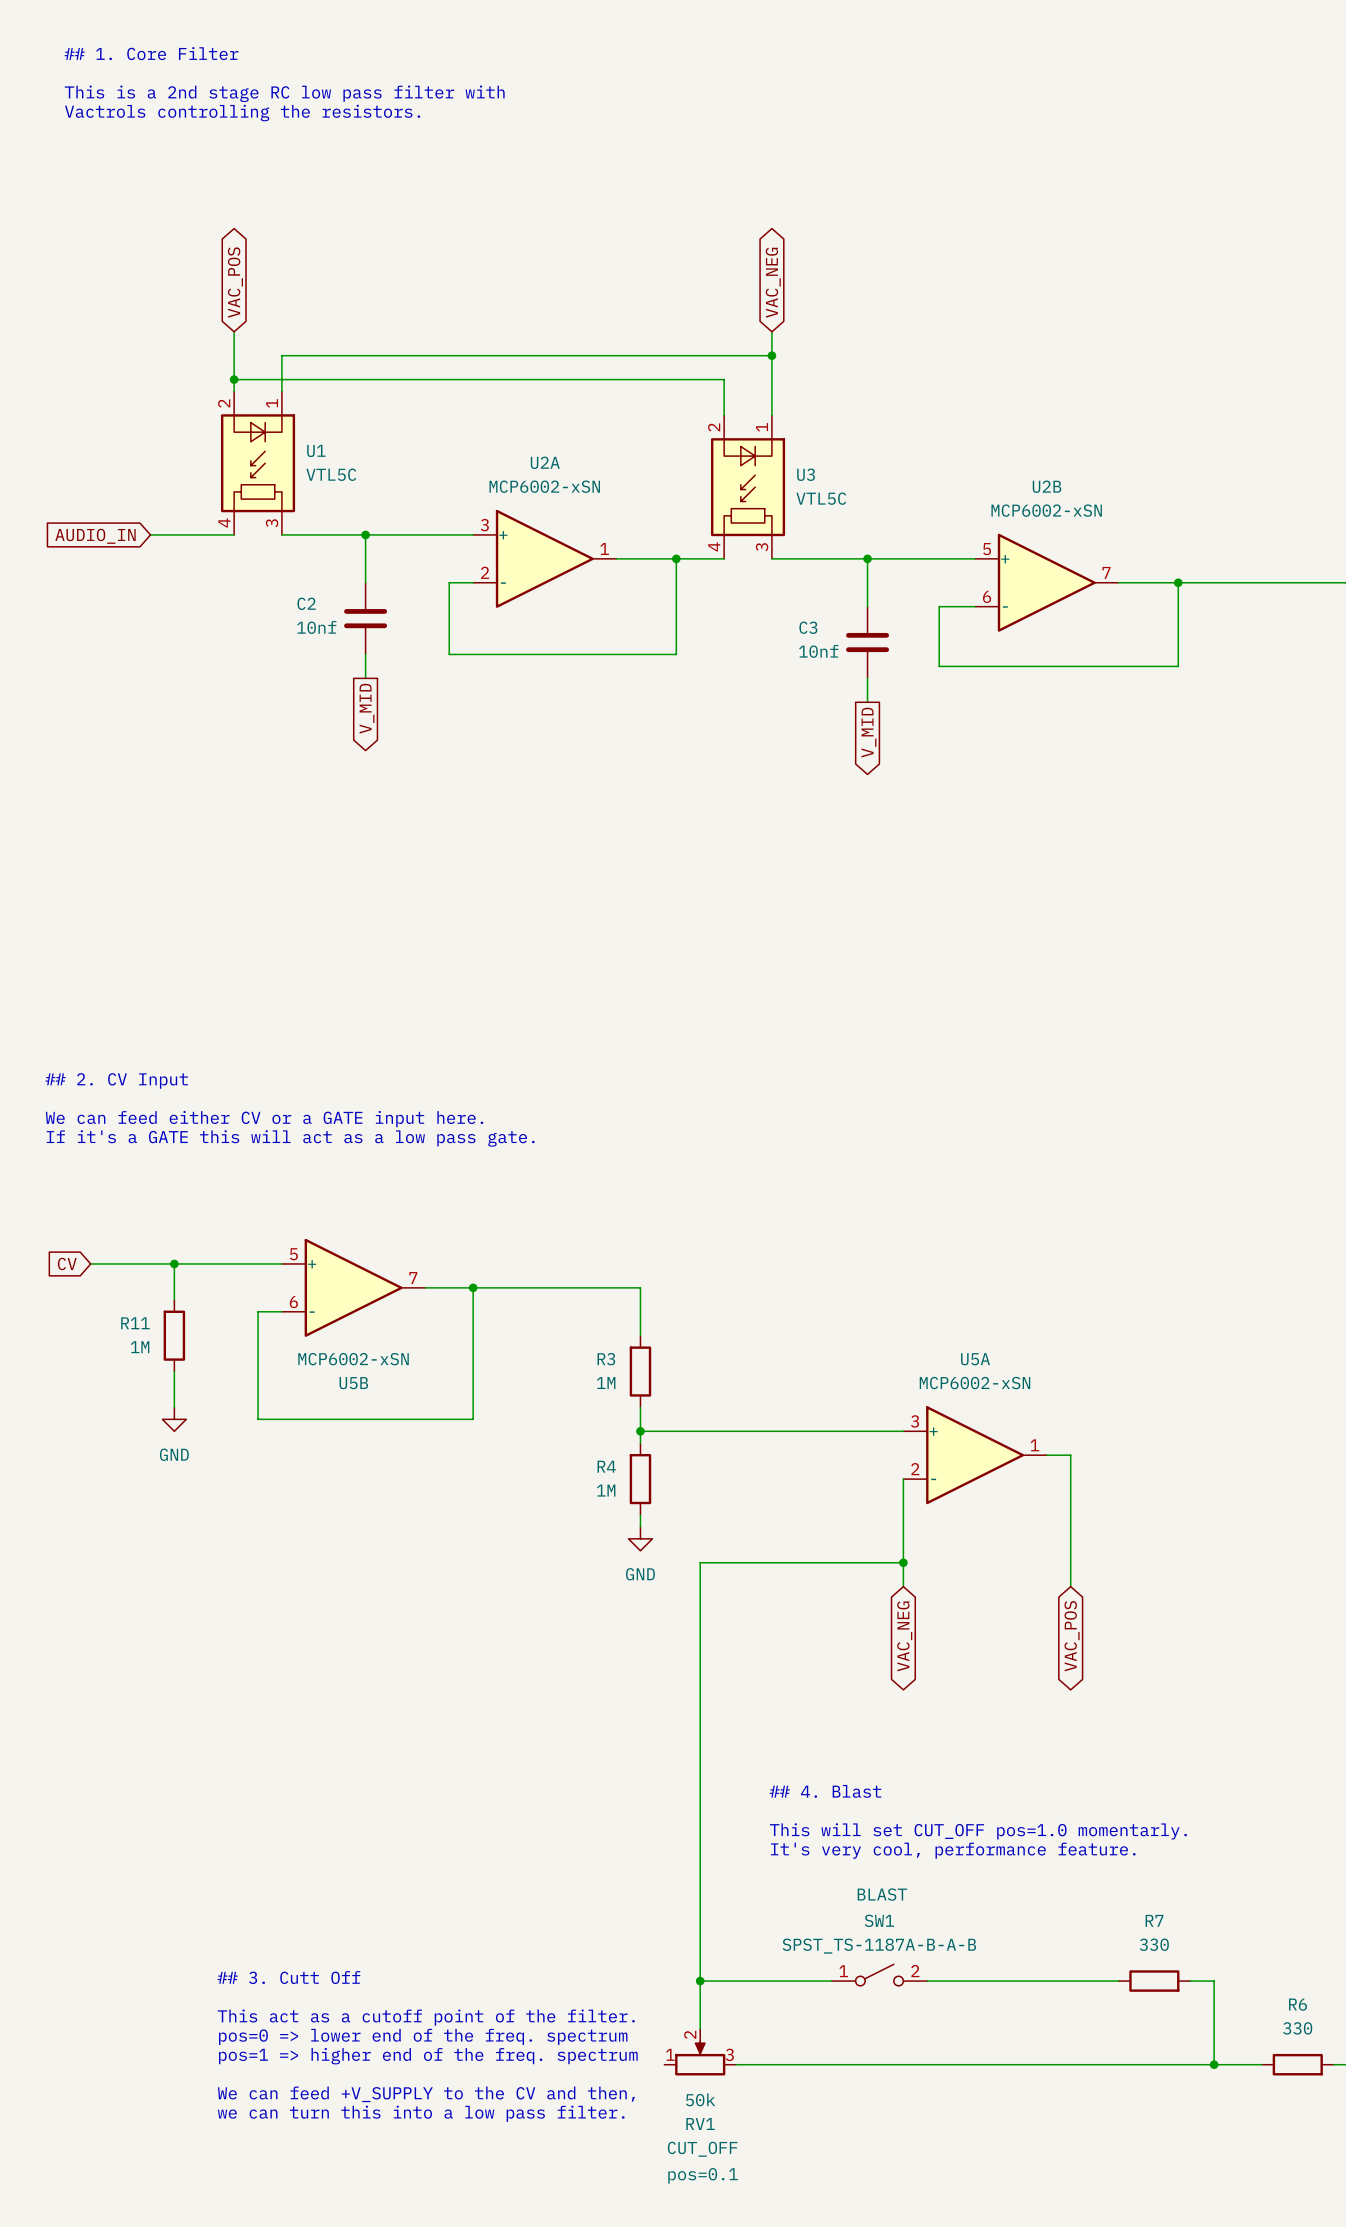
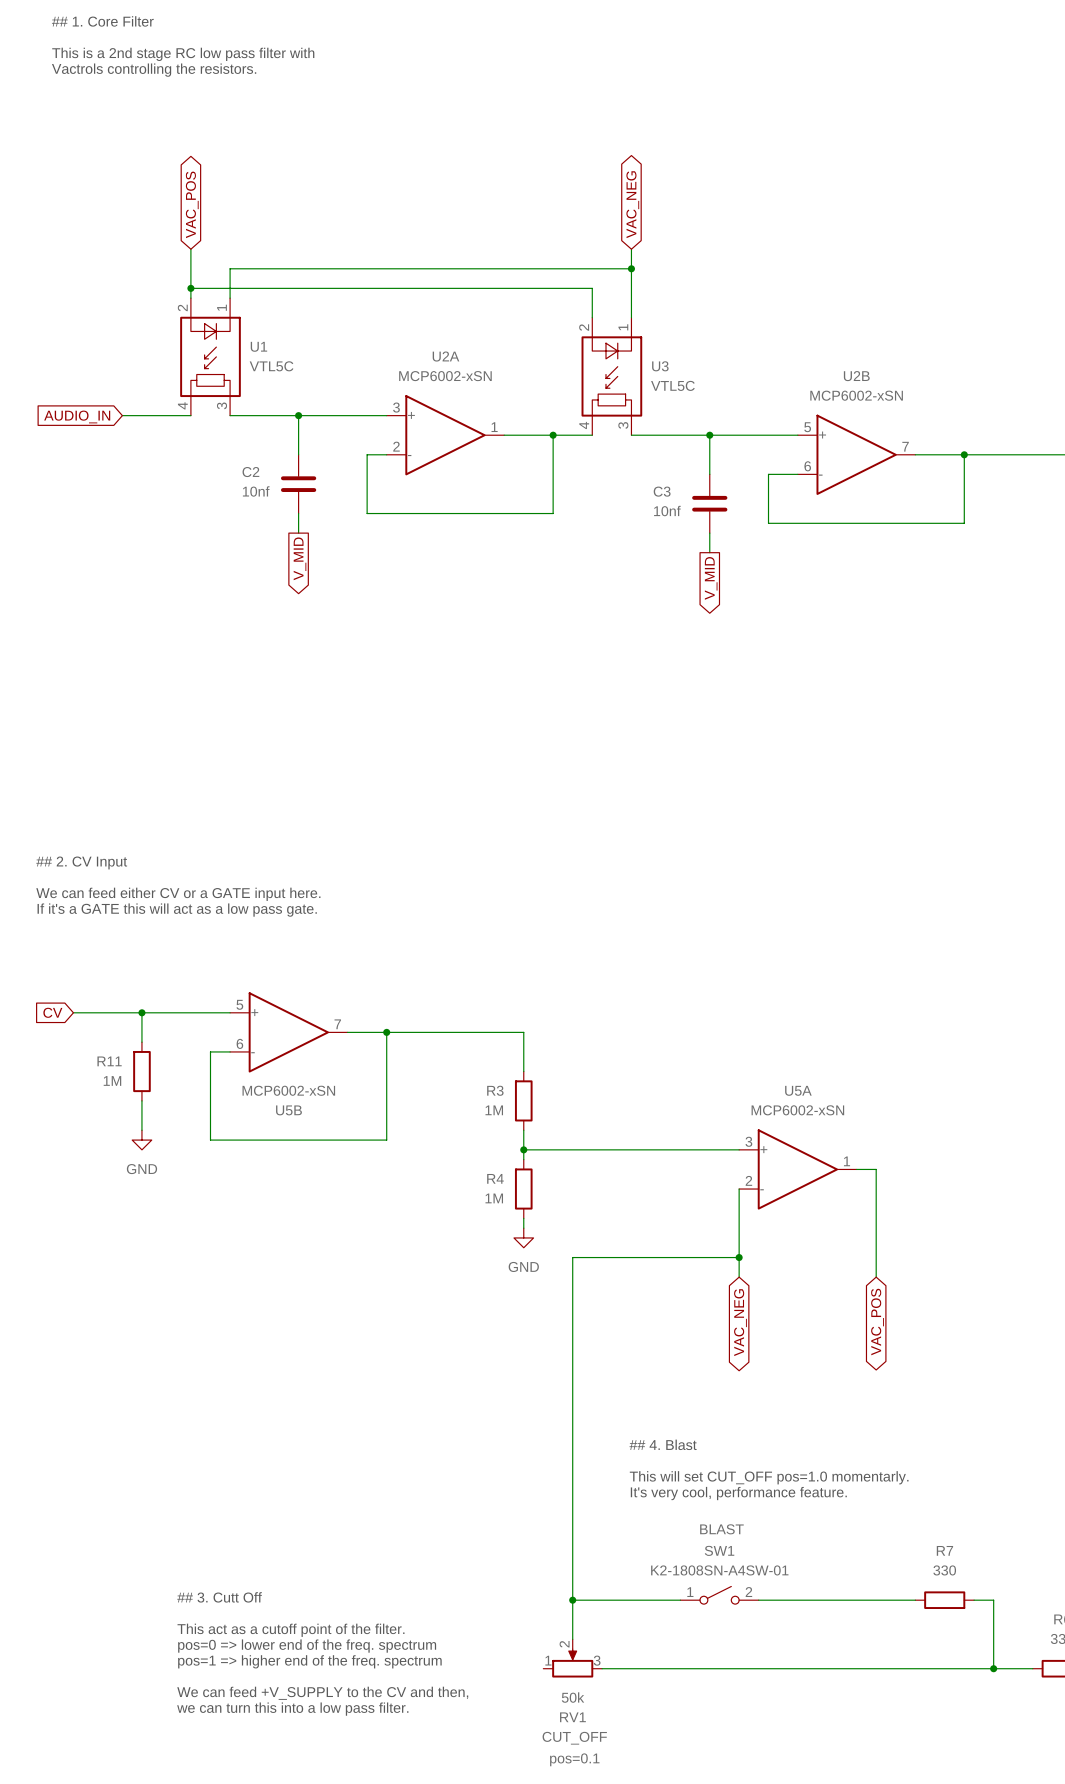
SW1 value: SPST_TS-1187A-B-A-B (879, 1946) -> K2-1808SN-A4SW-01 (719, 1570)

